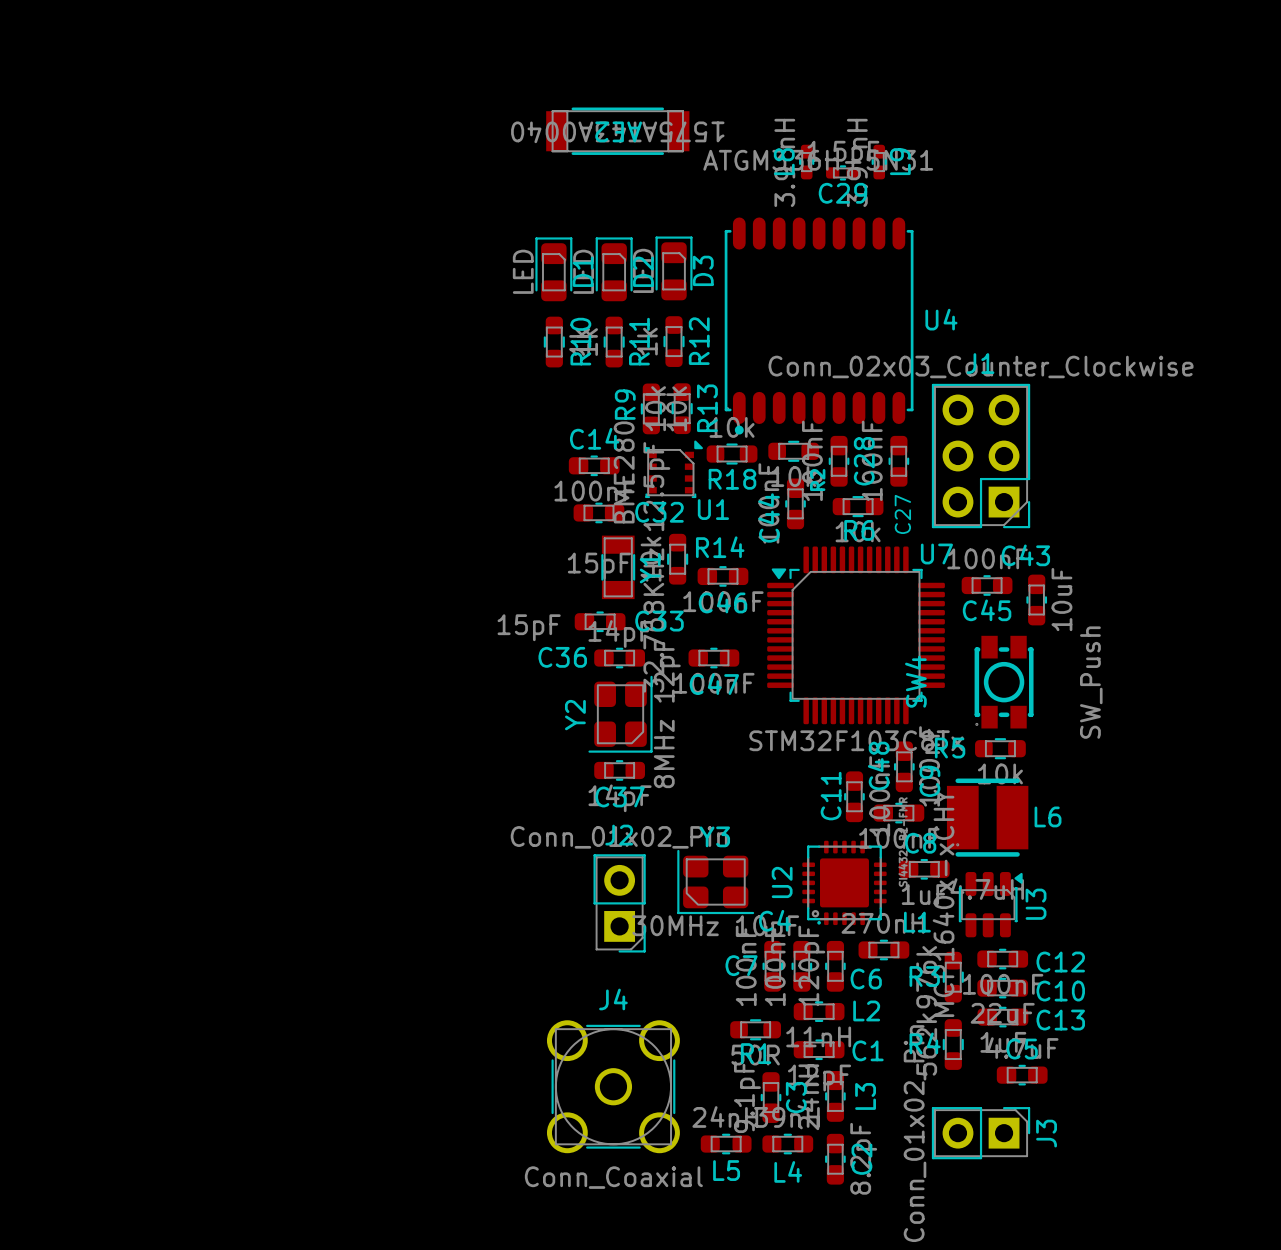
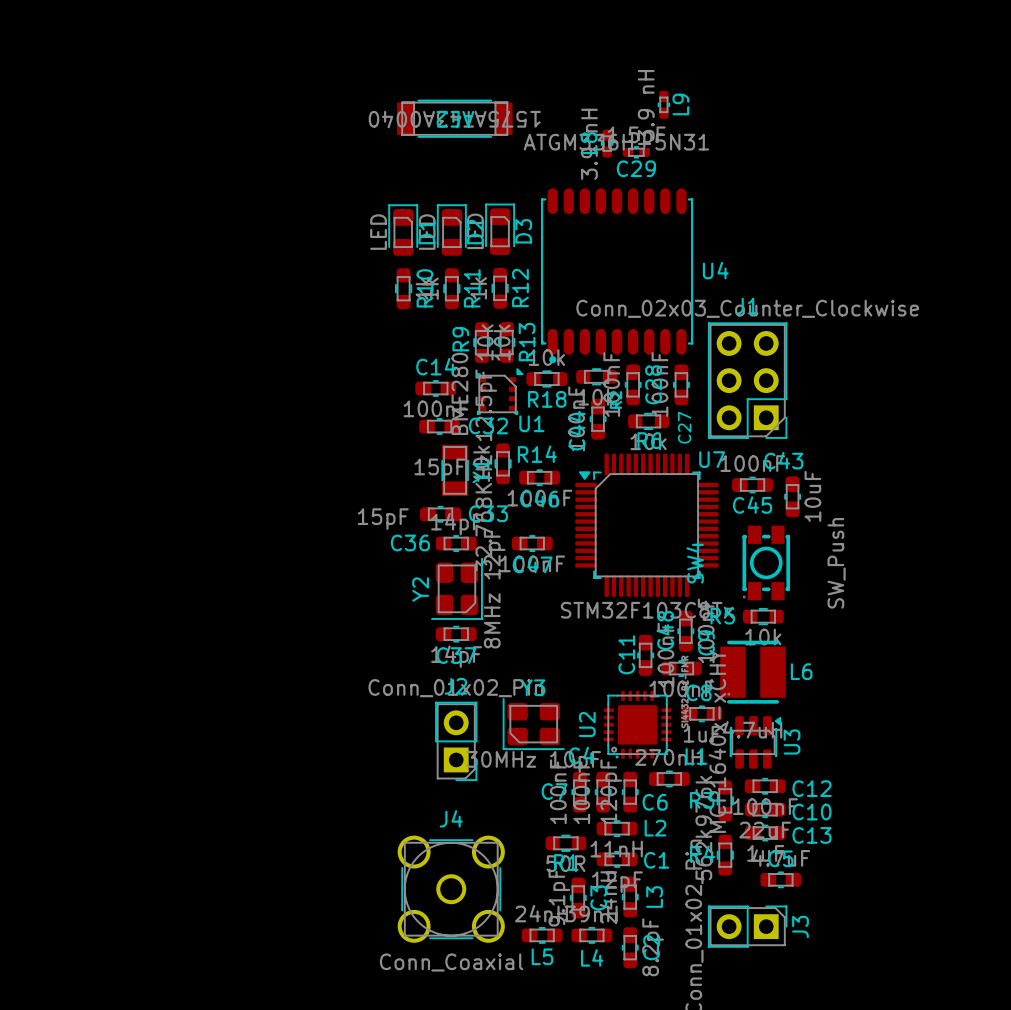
L9 position: (879, 162) -> (663, 104)

